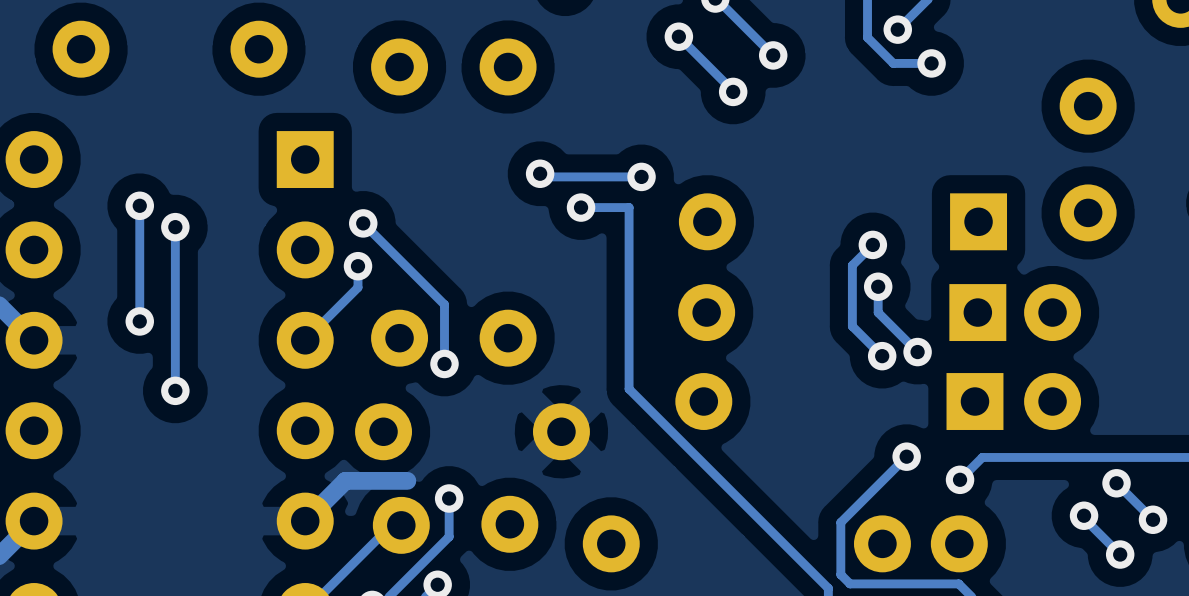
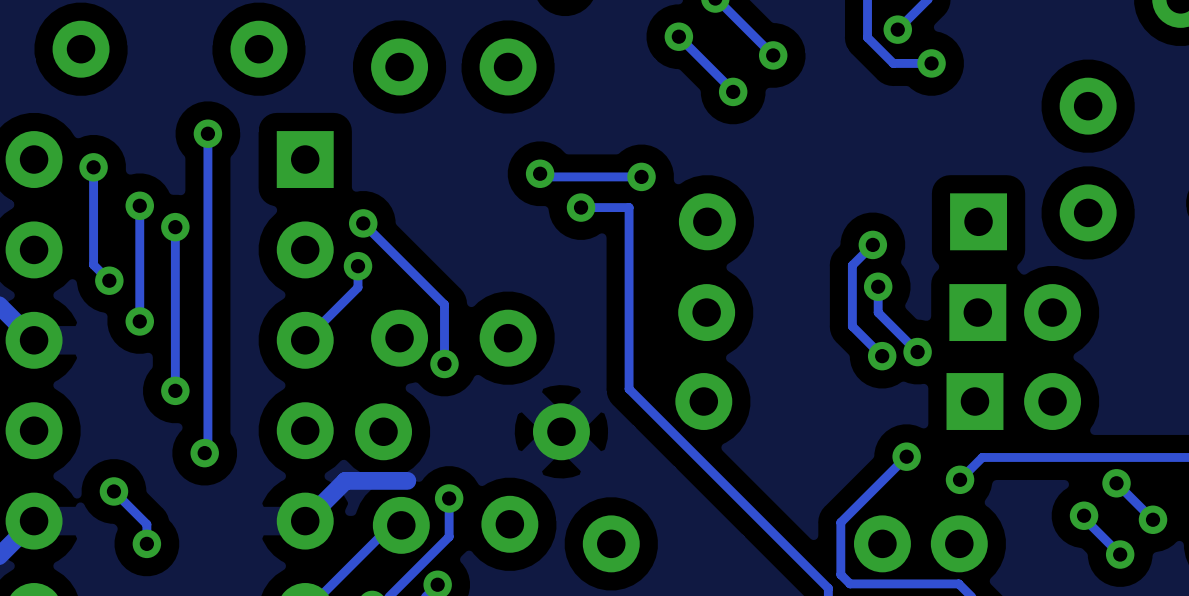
track: none -> (207, 133) (207, 449) (204, 453)
via: none -> (207, 133)
track: none -> (93, 167) (93, 264) (109, 280)
via: none -> (93, 167)
via: none -> (109, 280)
via: none -> (204, 453)
track: none -> (113, 491) (146, 524) (146, 543)
via: none -> (113, 491)
via: none -> (146, 543)

